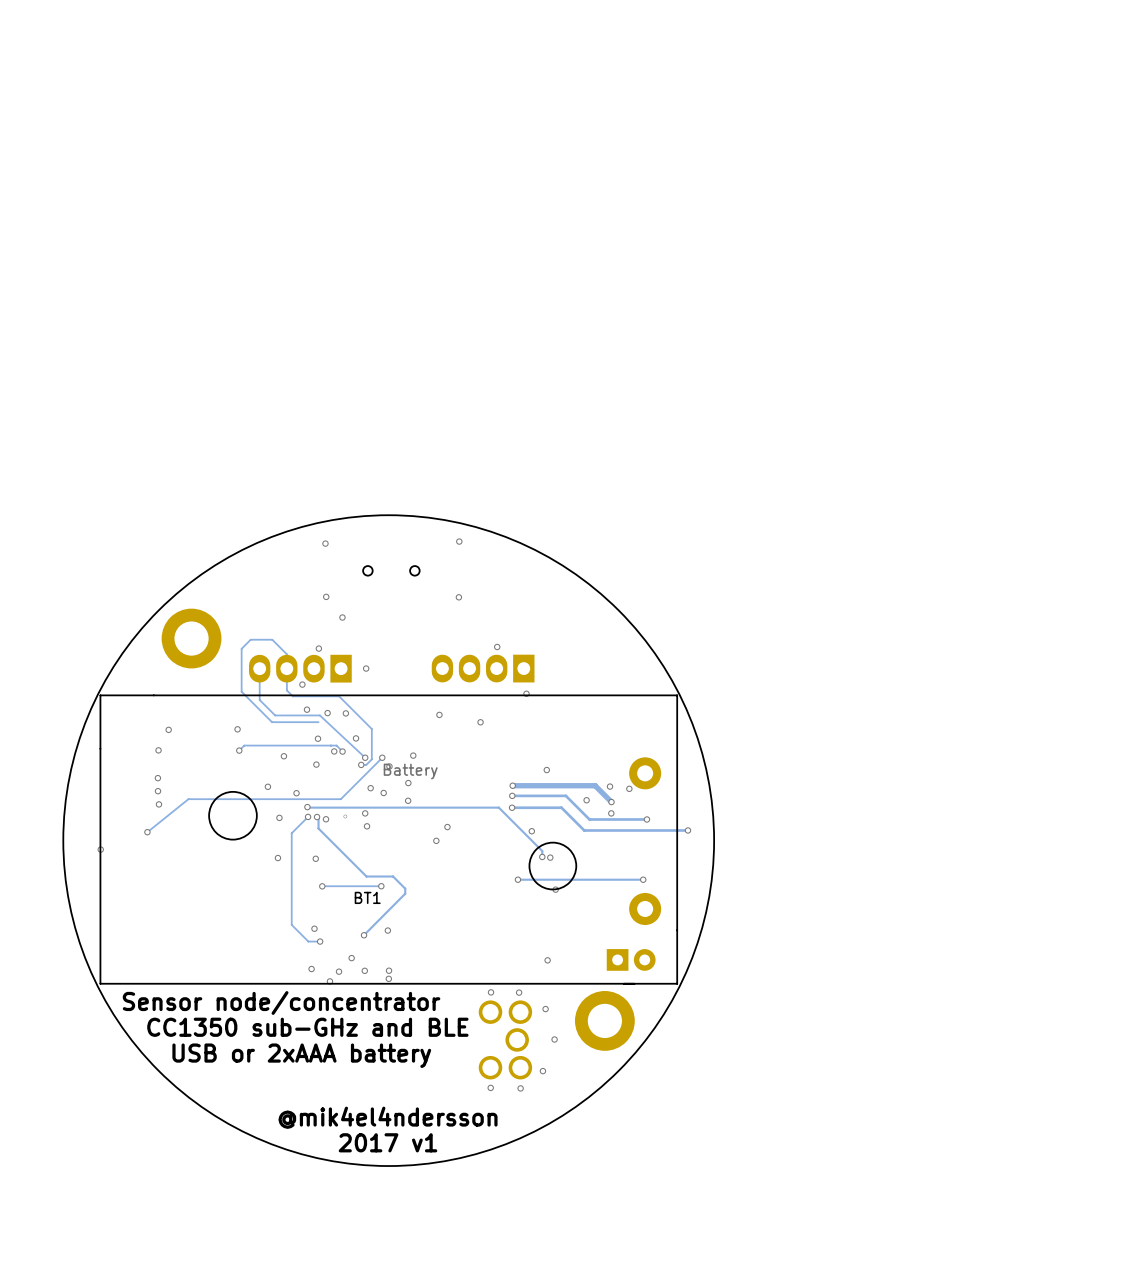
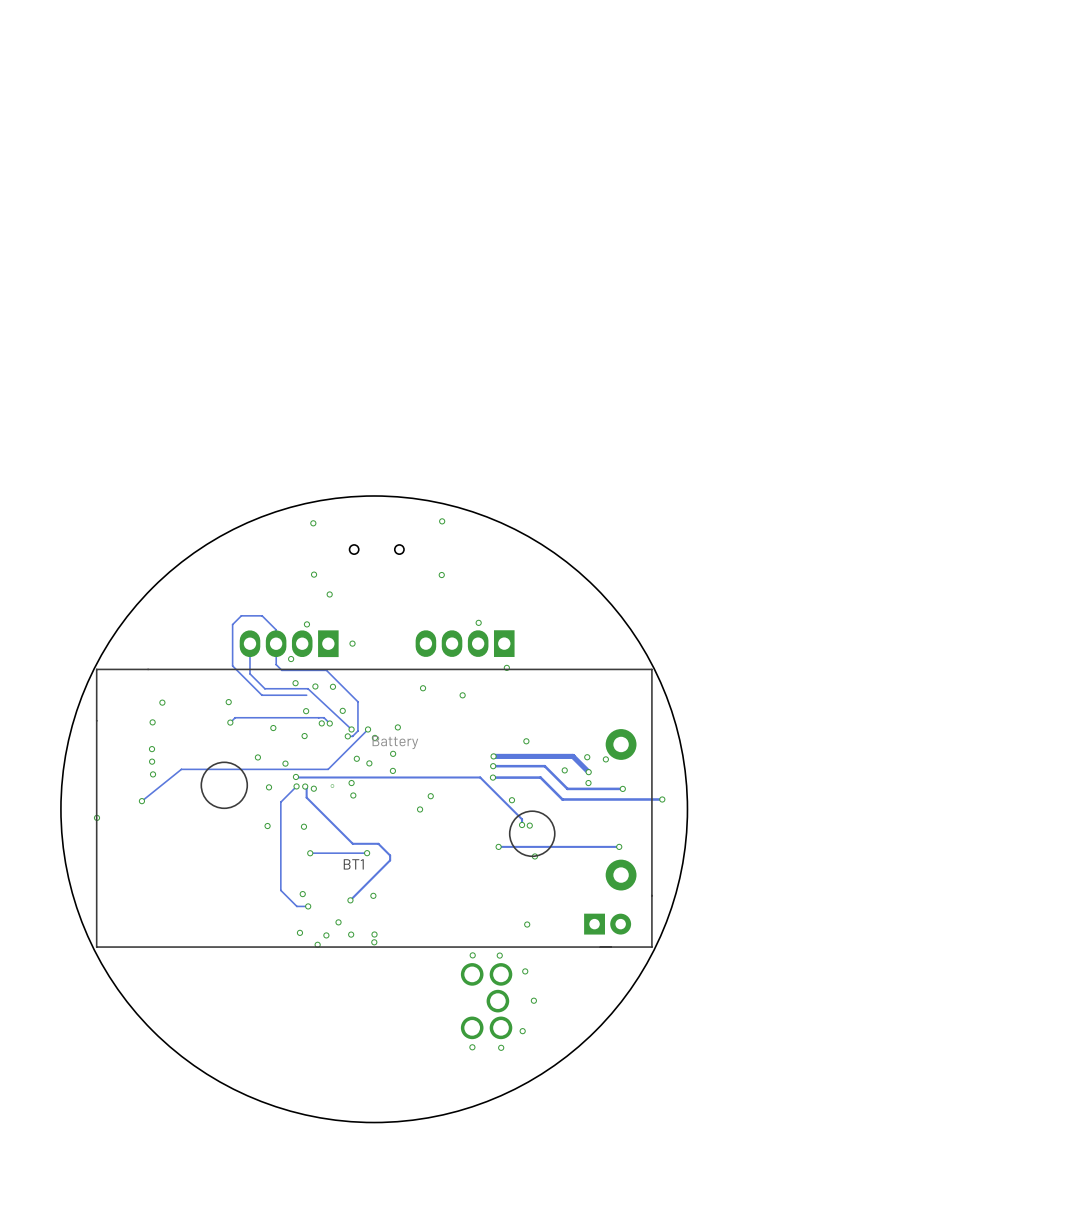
part: (191, 638) -> none
text: Sensor node/concentrator (281, 1002) -> none
part: (604, 1020) -> none
text: CC1350 sub-GHz and BLE (307, 1027) -> none
text: USB or 2xAAA battery (301, 1055) -> none
text: @mik4el4ndersson (388, 1117) -> none
text: 2017 v1 (388, 1142) -> none

